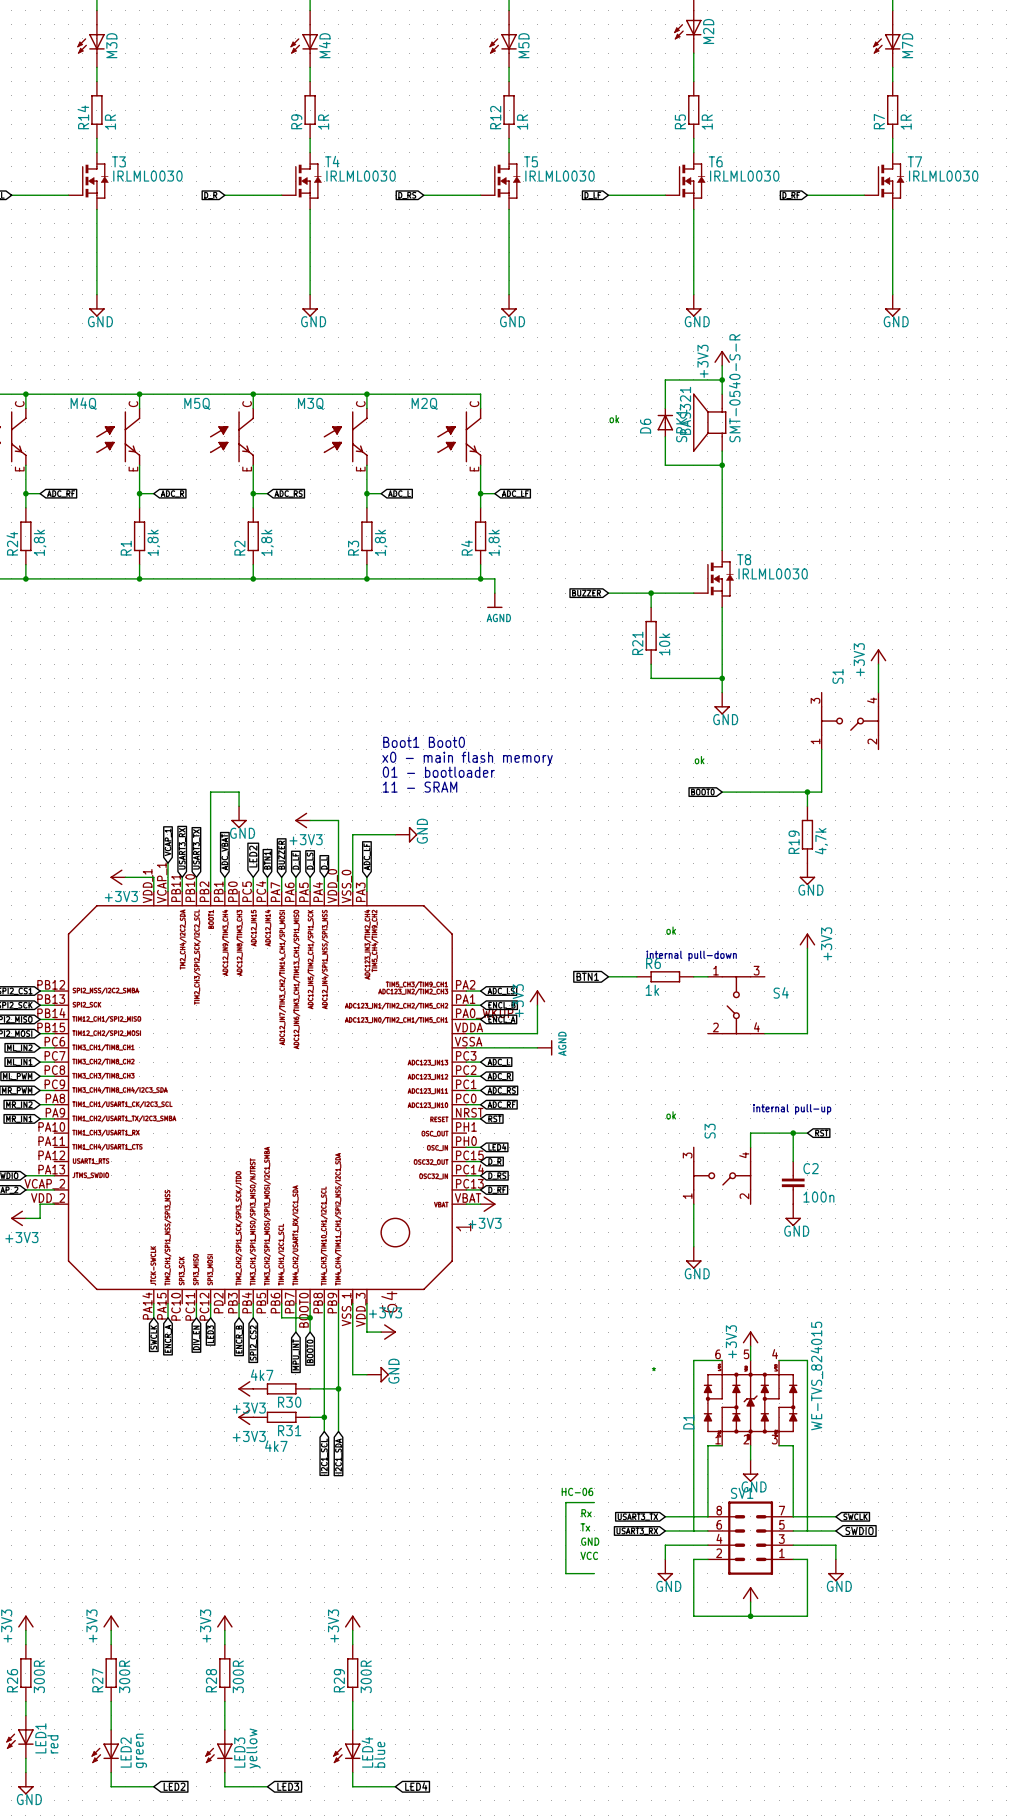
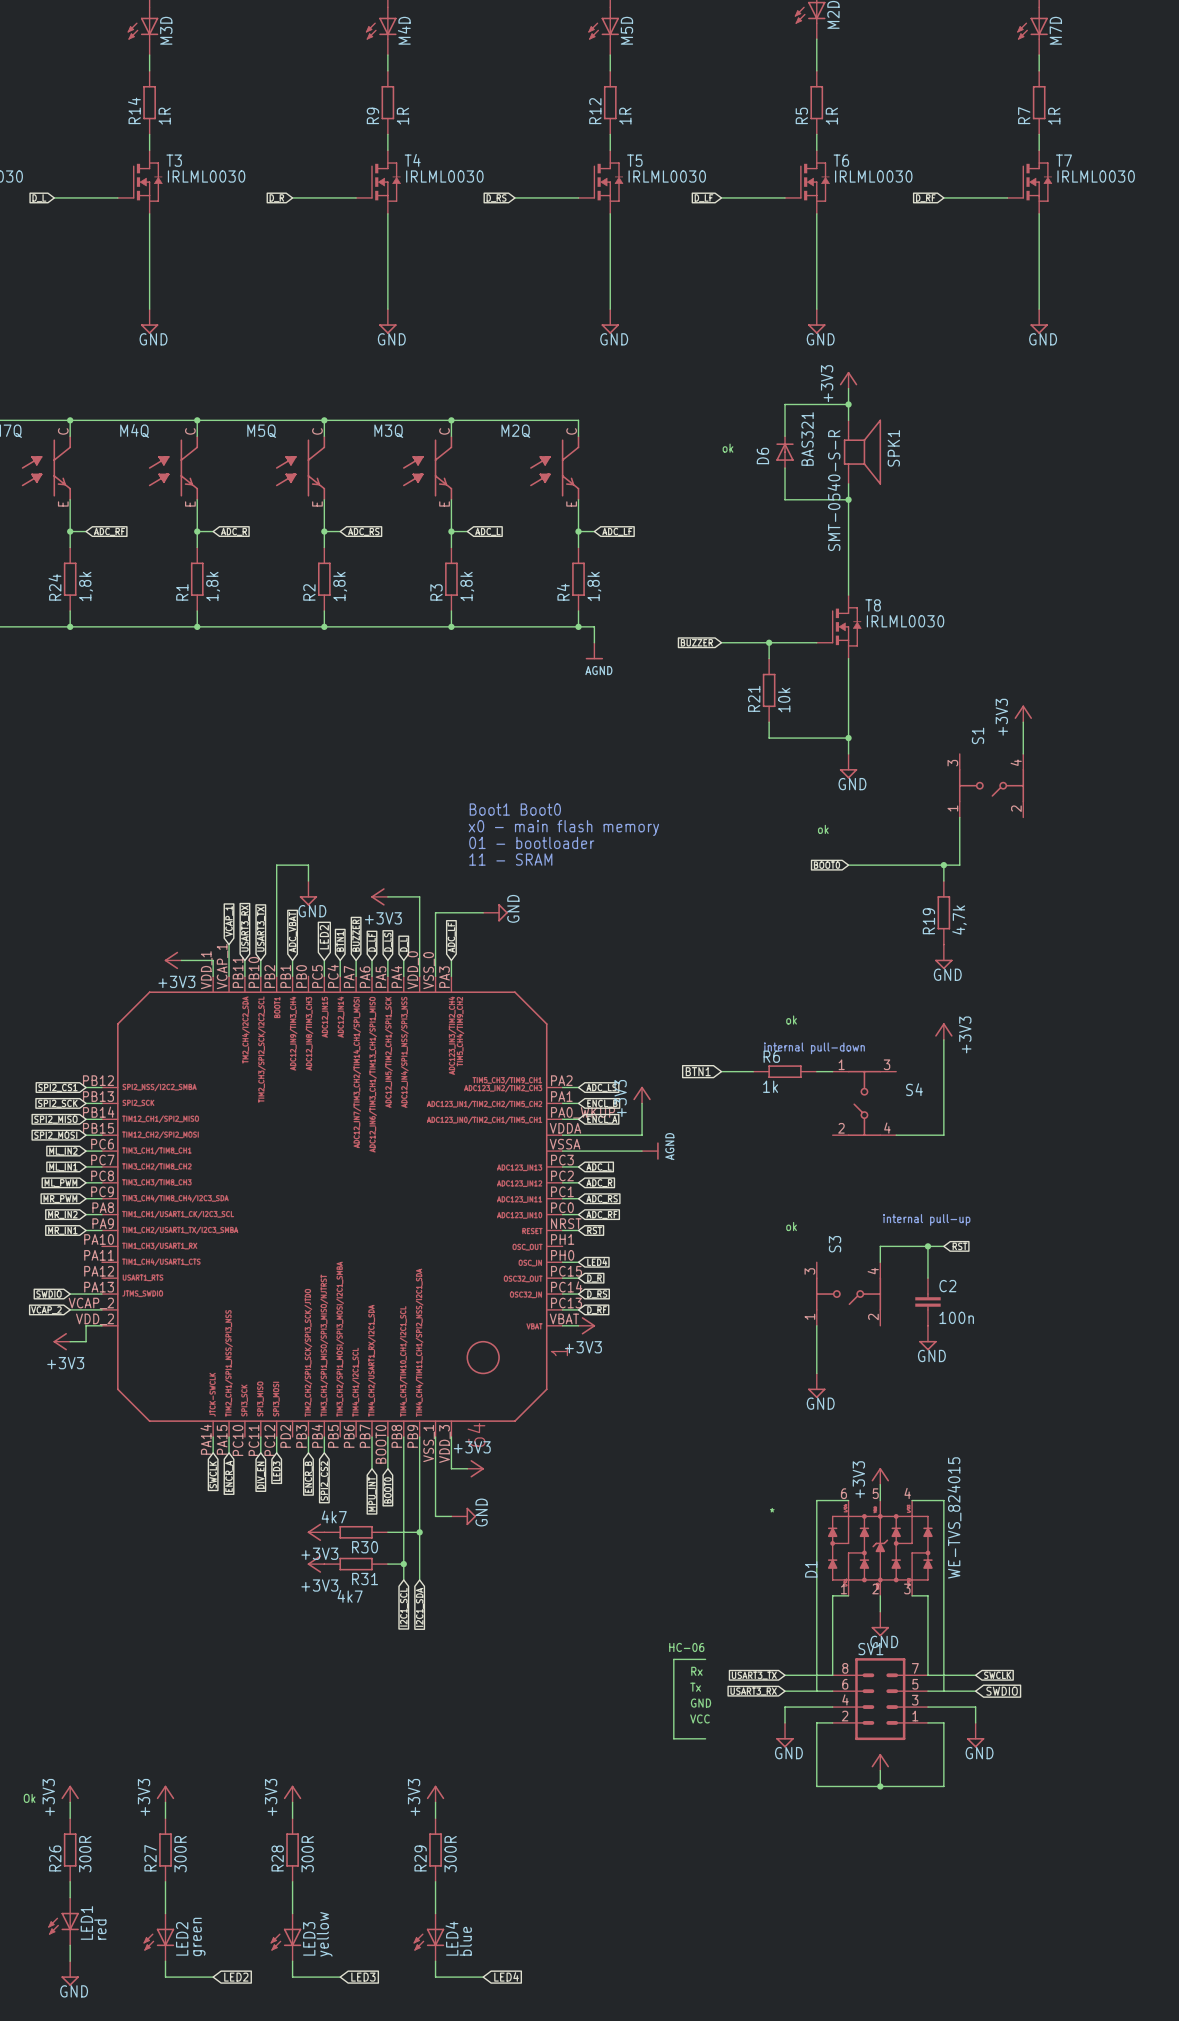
SPK1 rotation: 0° (709, 422) -> 180° (862, 452)
wire: (281, 1303) (281, 1317) (310, 1317) -> none
junction: (310, 1317) -> none

